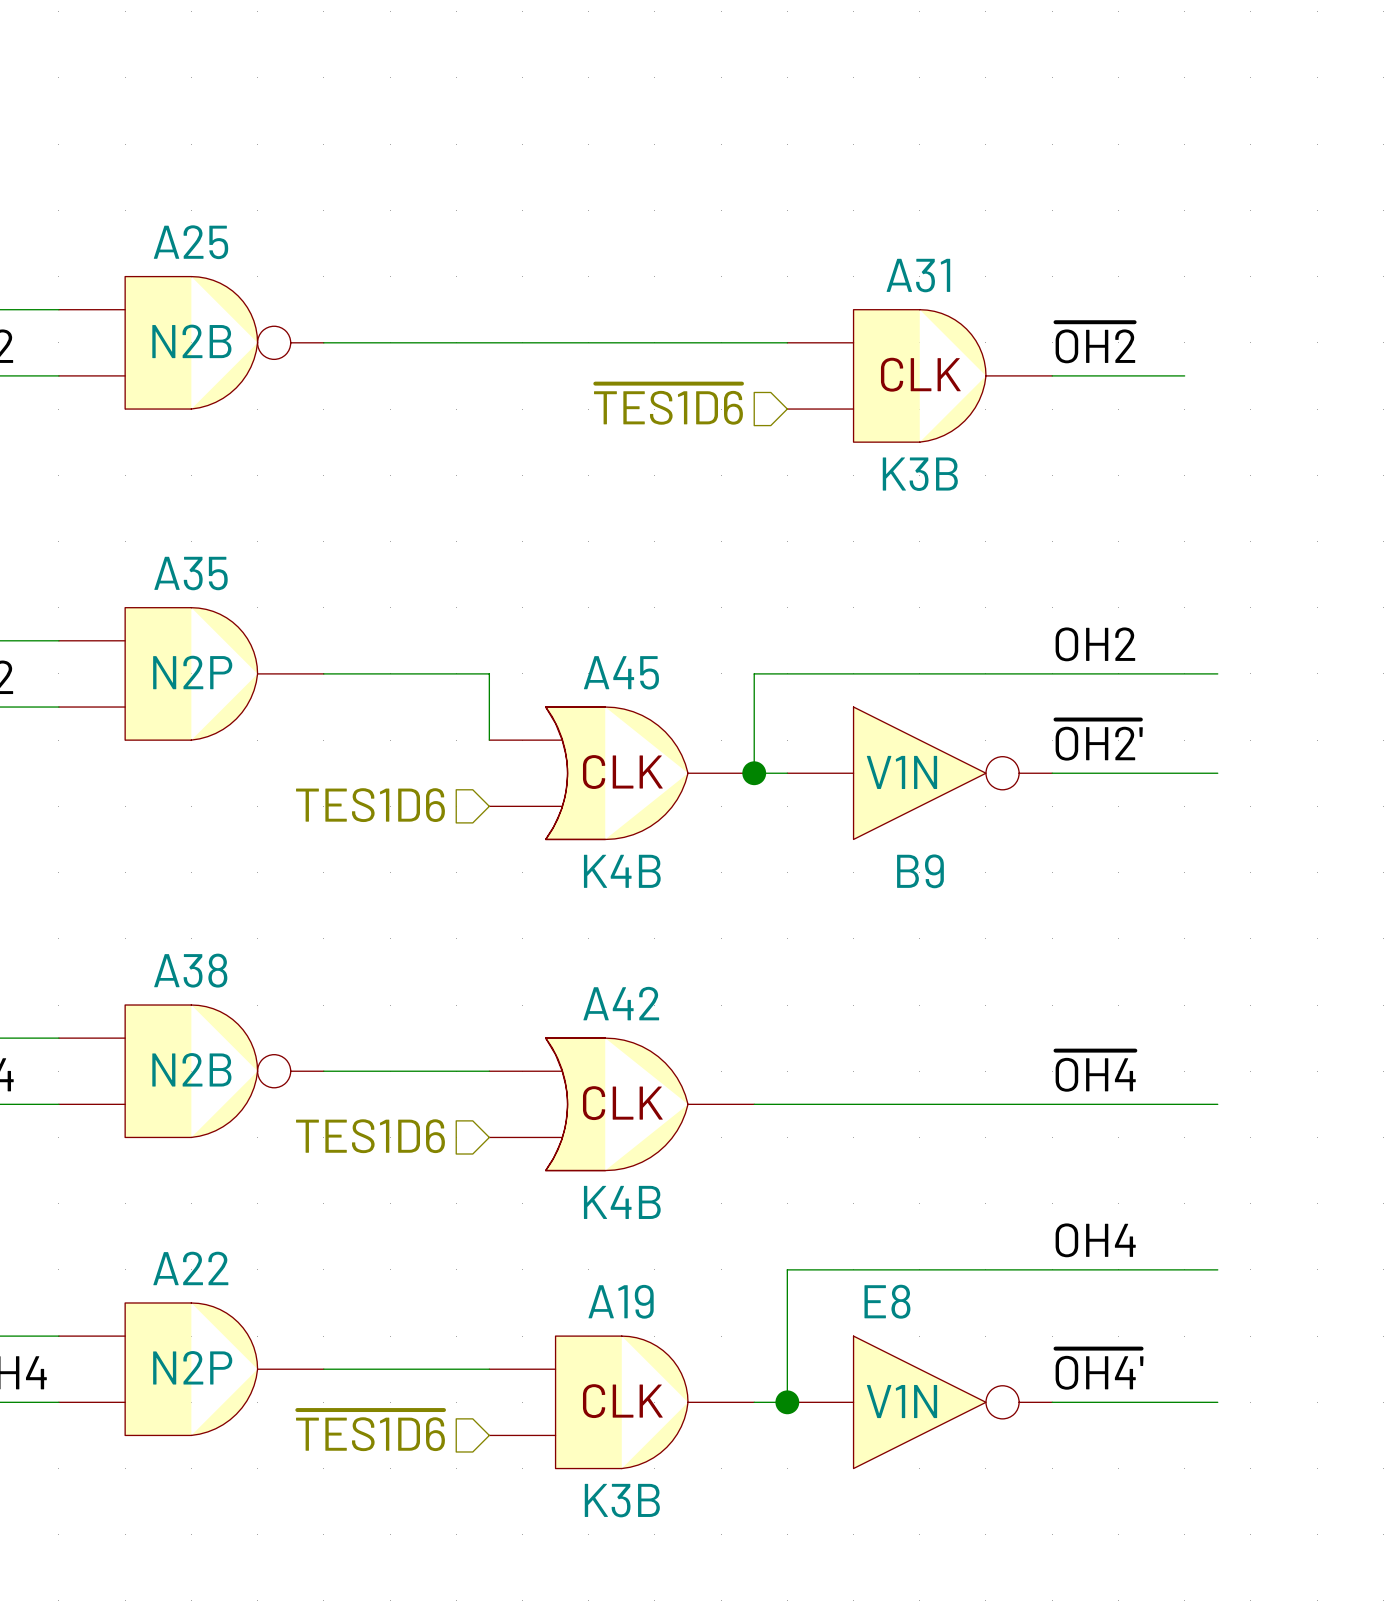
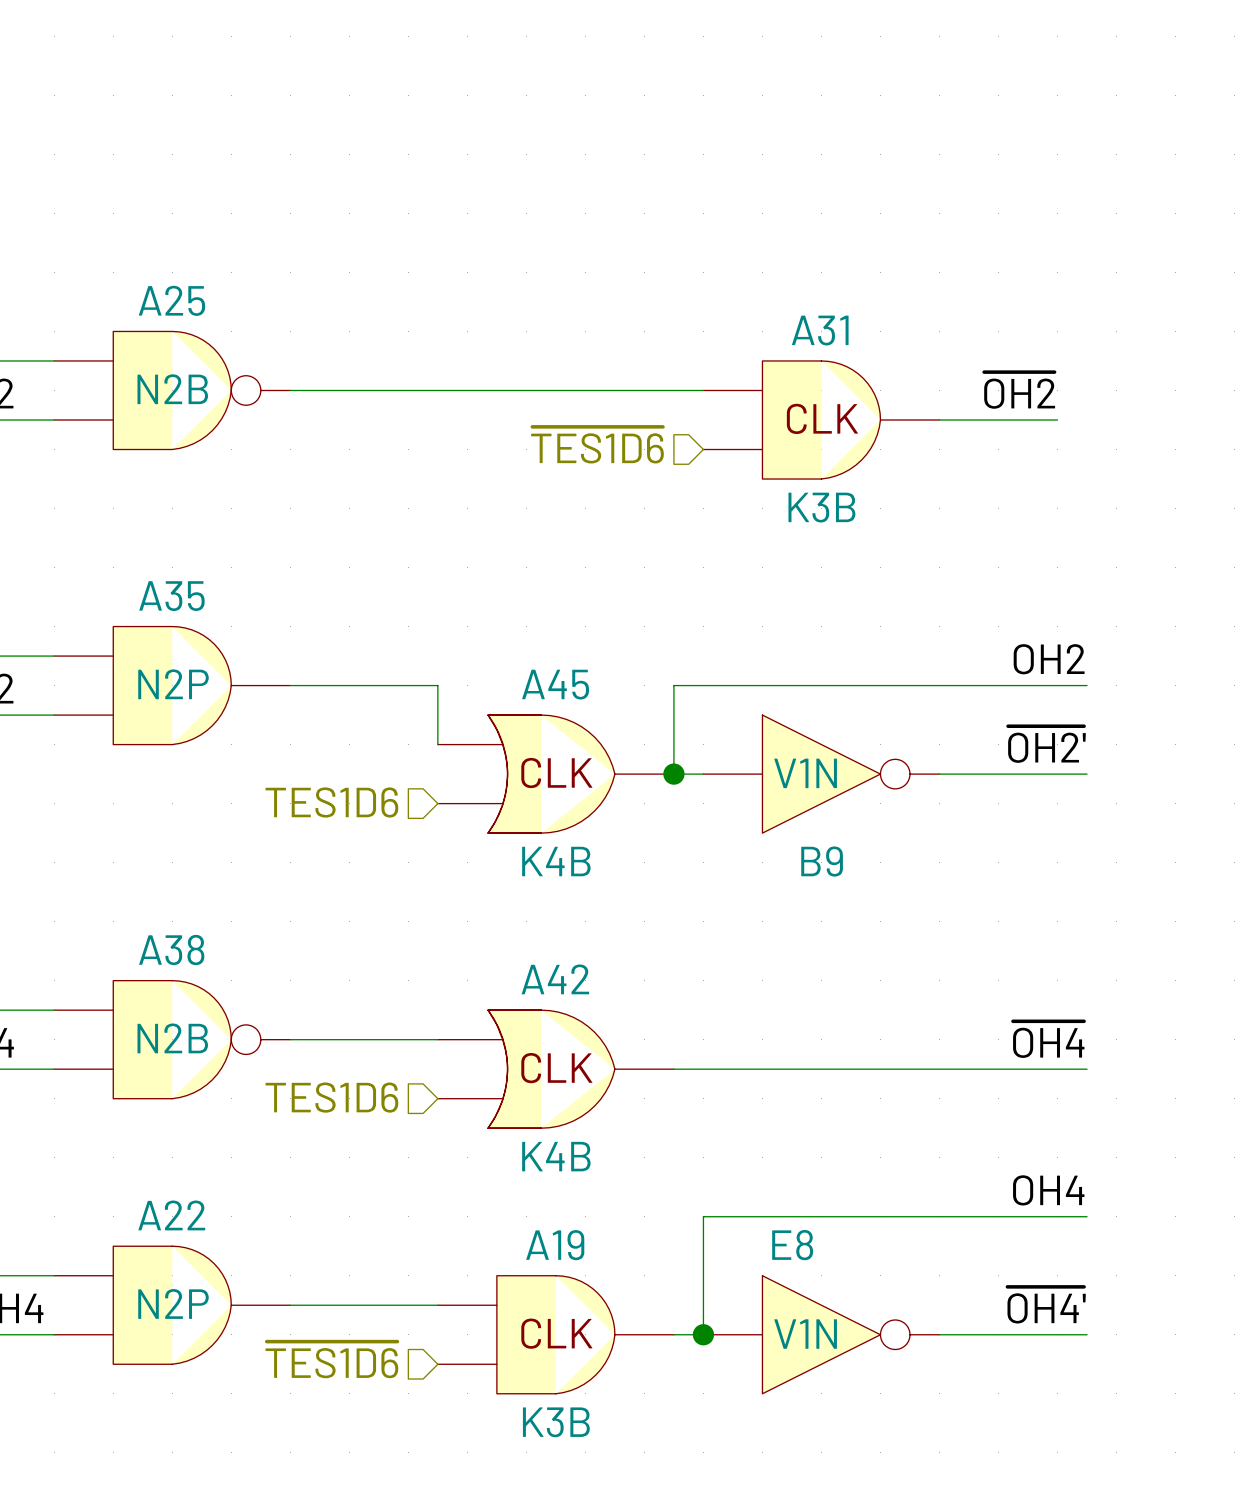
label position: ~{OH2} (1095, 342) -> ~{OH2} (1019, 390)
label position: OH2 (1095, 644) -> OH2 (1049, 659)
label position: ~{OH2'} (1099, 740) -> ~{OH2'} (1046, 744)
label position: ~{OH4} (1095, 1071) -> ~{OH4} (1048, 1039)
label position: OH4 (1095, 1240) -> OH4 (1048, 1190)
label position: ~{OH4'} (1099, 1369) -> ~{OH4'} (1046, 1305)

